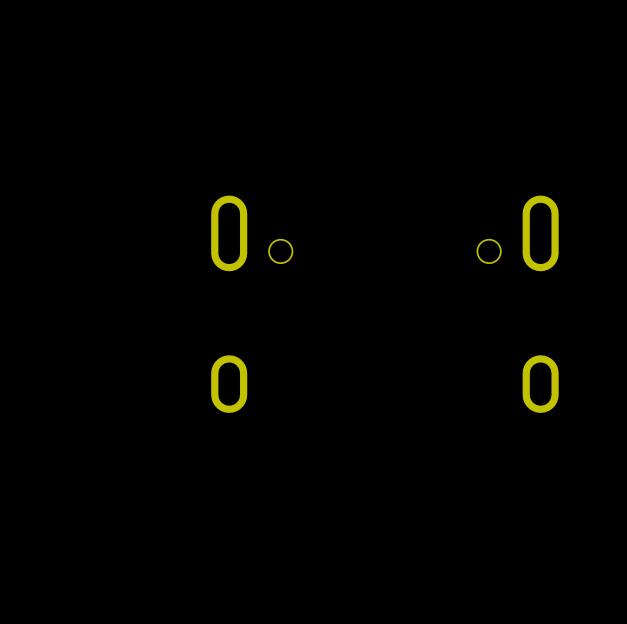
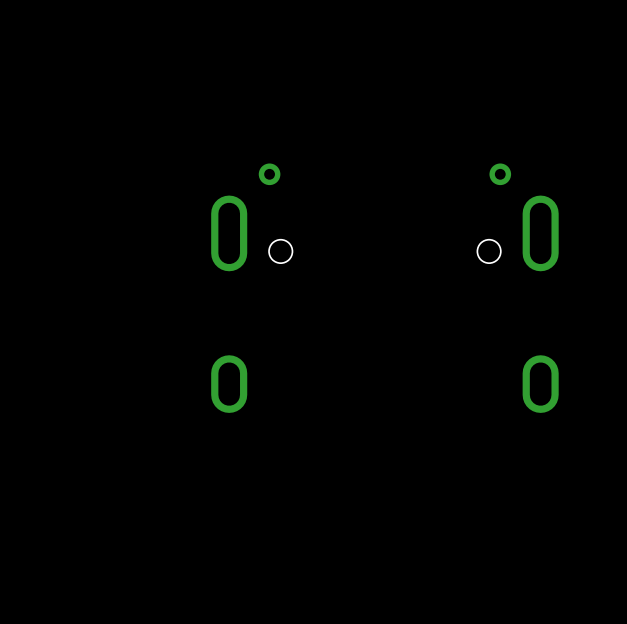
via: none -> (269, 174)
via: none -> (500, 174)

